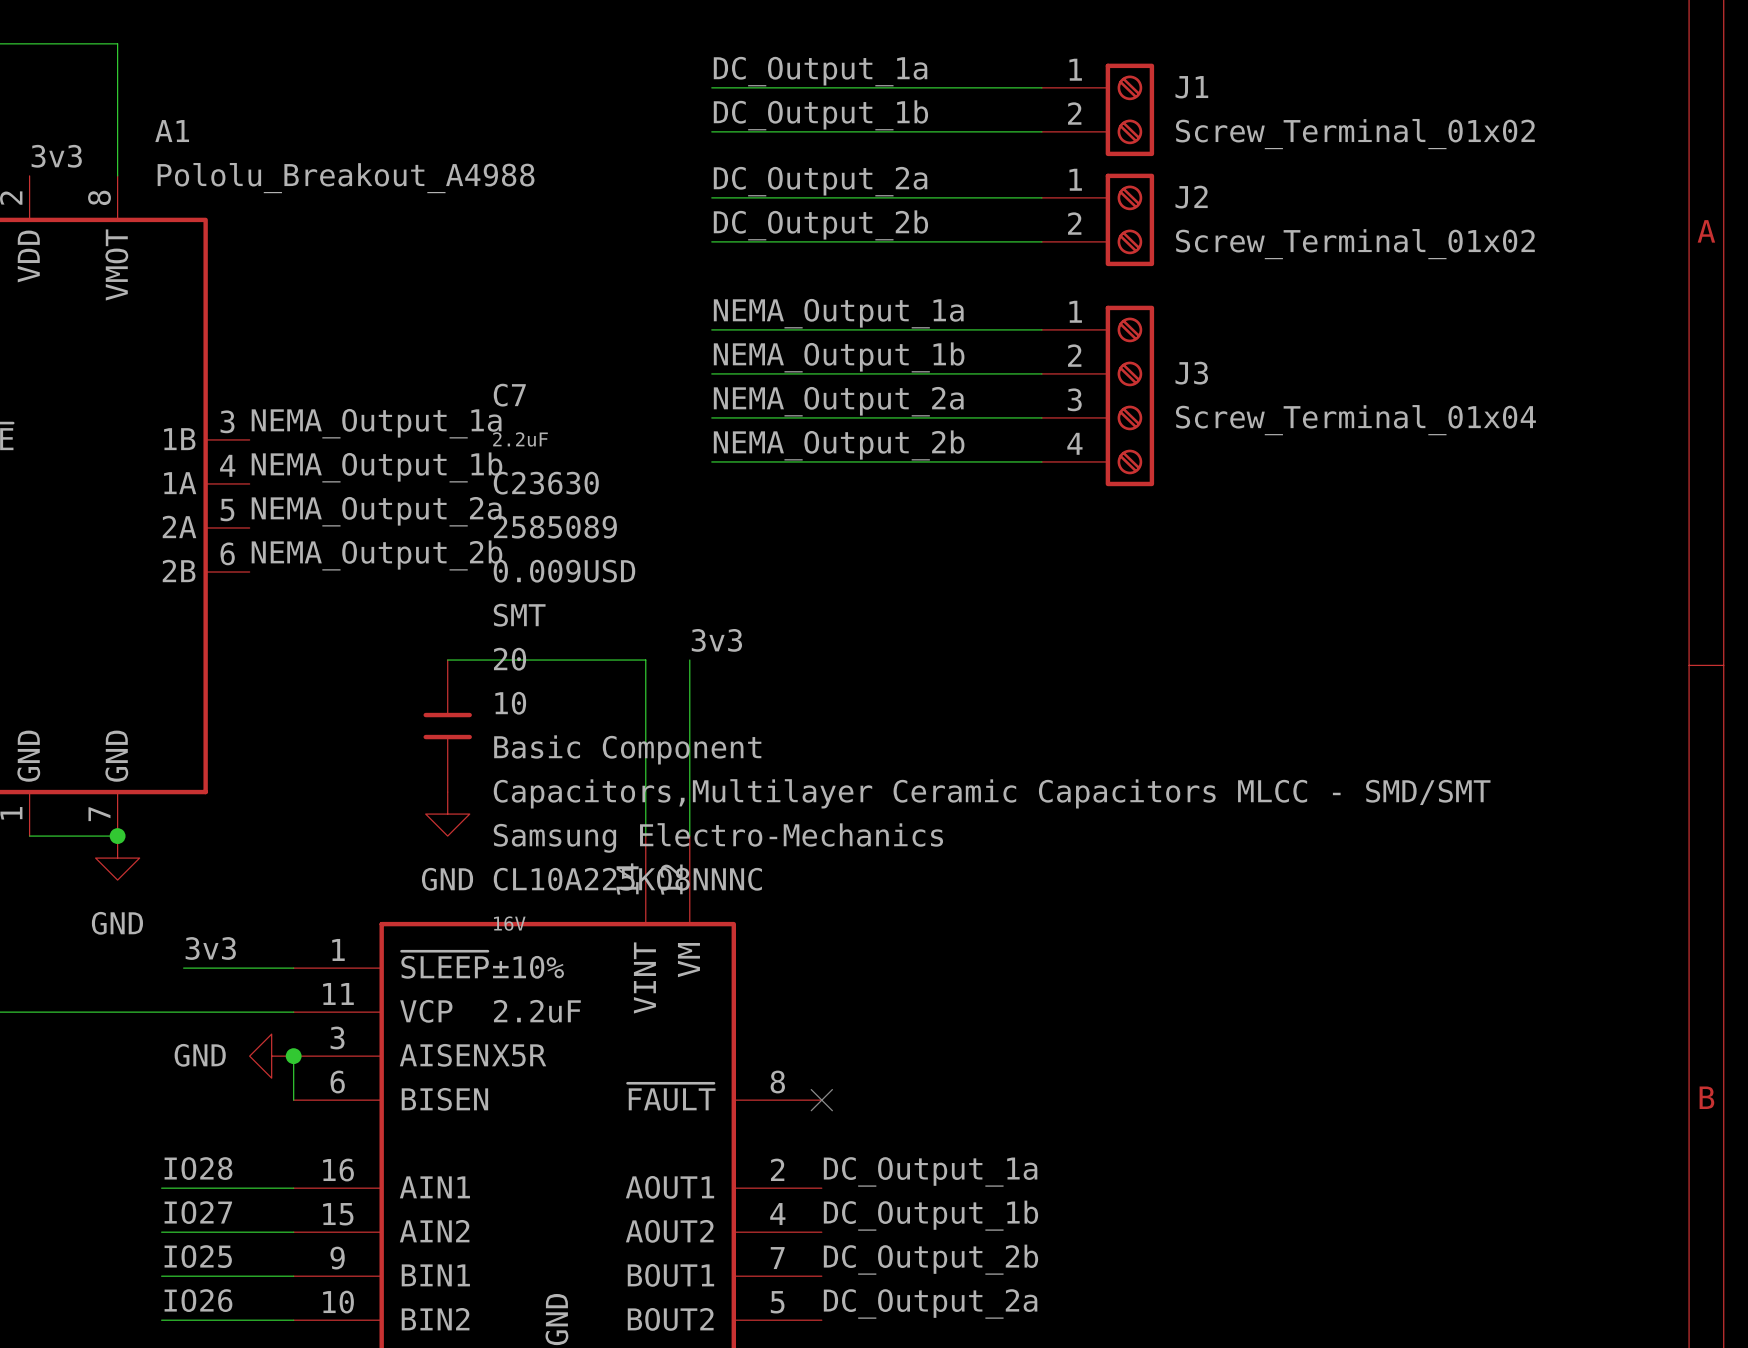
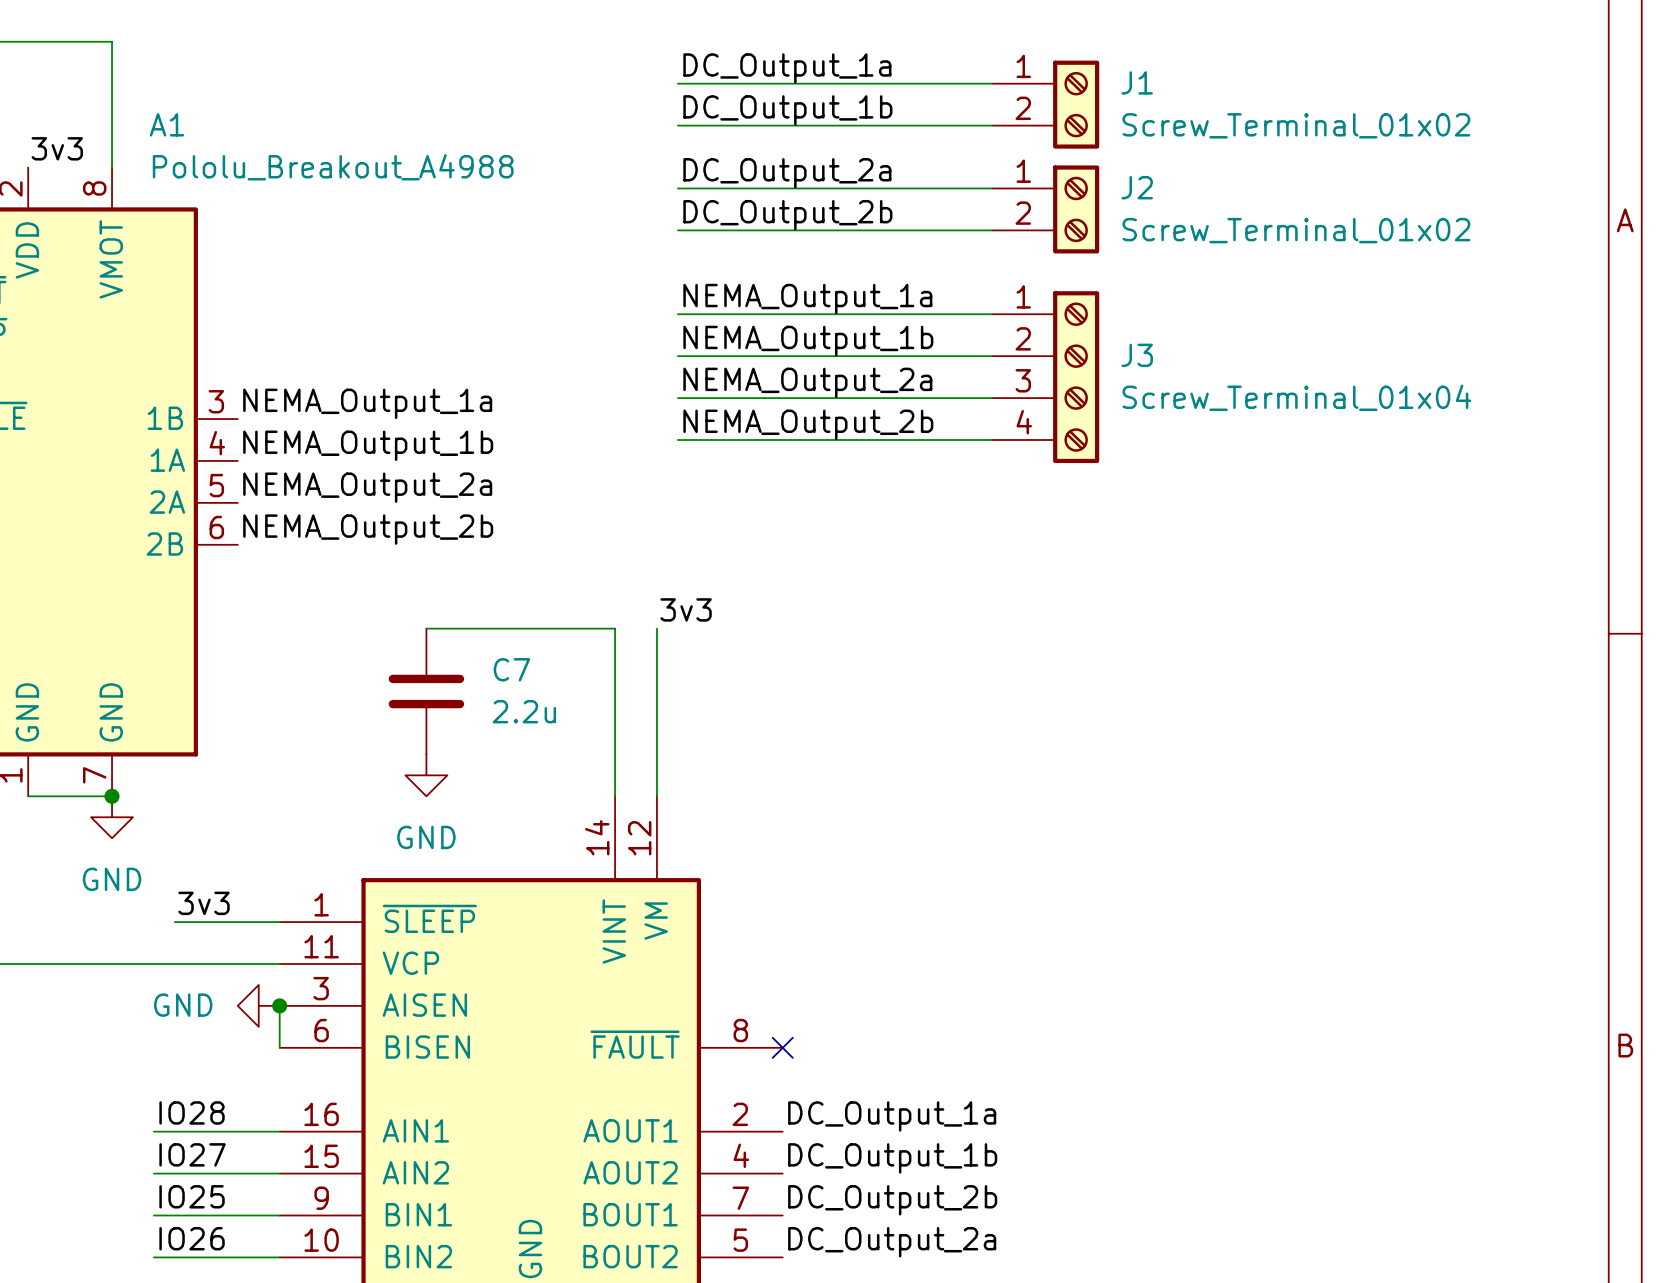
C7 name position: C7 (509, 395) -> C7 (511, 669)
C7 value: 2.2uF (520, 439) -> 2.2u (524, 711)
C7 text: C23630 (546, 483) -> none
C7 text: 2585089 (555, 527) -> none
C7 text: 0.009USD (564, 571) -> none
C7 text: SMT (519, 615) -> none
C7 text: 20 (510, 659) -> none
C7 symbol: [423, 660, 472, 793] -> [388, 628, 465, 755]
C7 text: 10 (510, 703) -> none
C7 text: Basic Component (627, 749) -> none
C7 text: Capacitors,Multilayer Ceramic Capacitors MLCC - SMD/SMT (992, 793) -> none
C7 text: Samsung Electro-Mechanics (718, 837) -> none
C7 text: CL10A225KO8NNNC (627, 879) -> none
C7 text: 16V (509, 923) -> none
C7 text: ±10% (528, 967) -> none
C7 text: 2.2uF (537, 1011) -> none
C7 text: X5R (519, 1055) -> none

